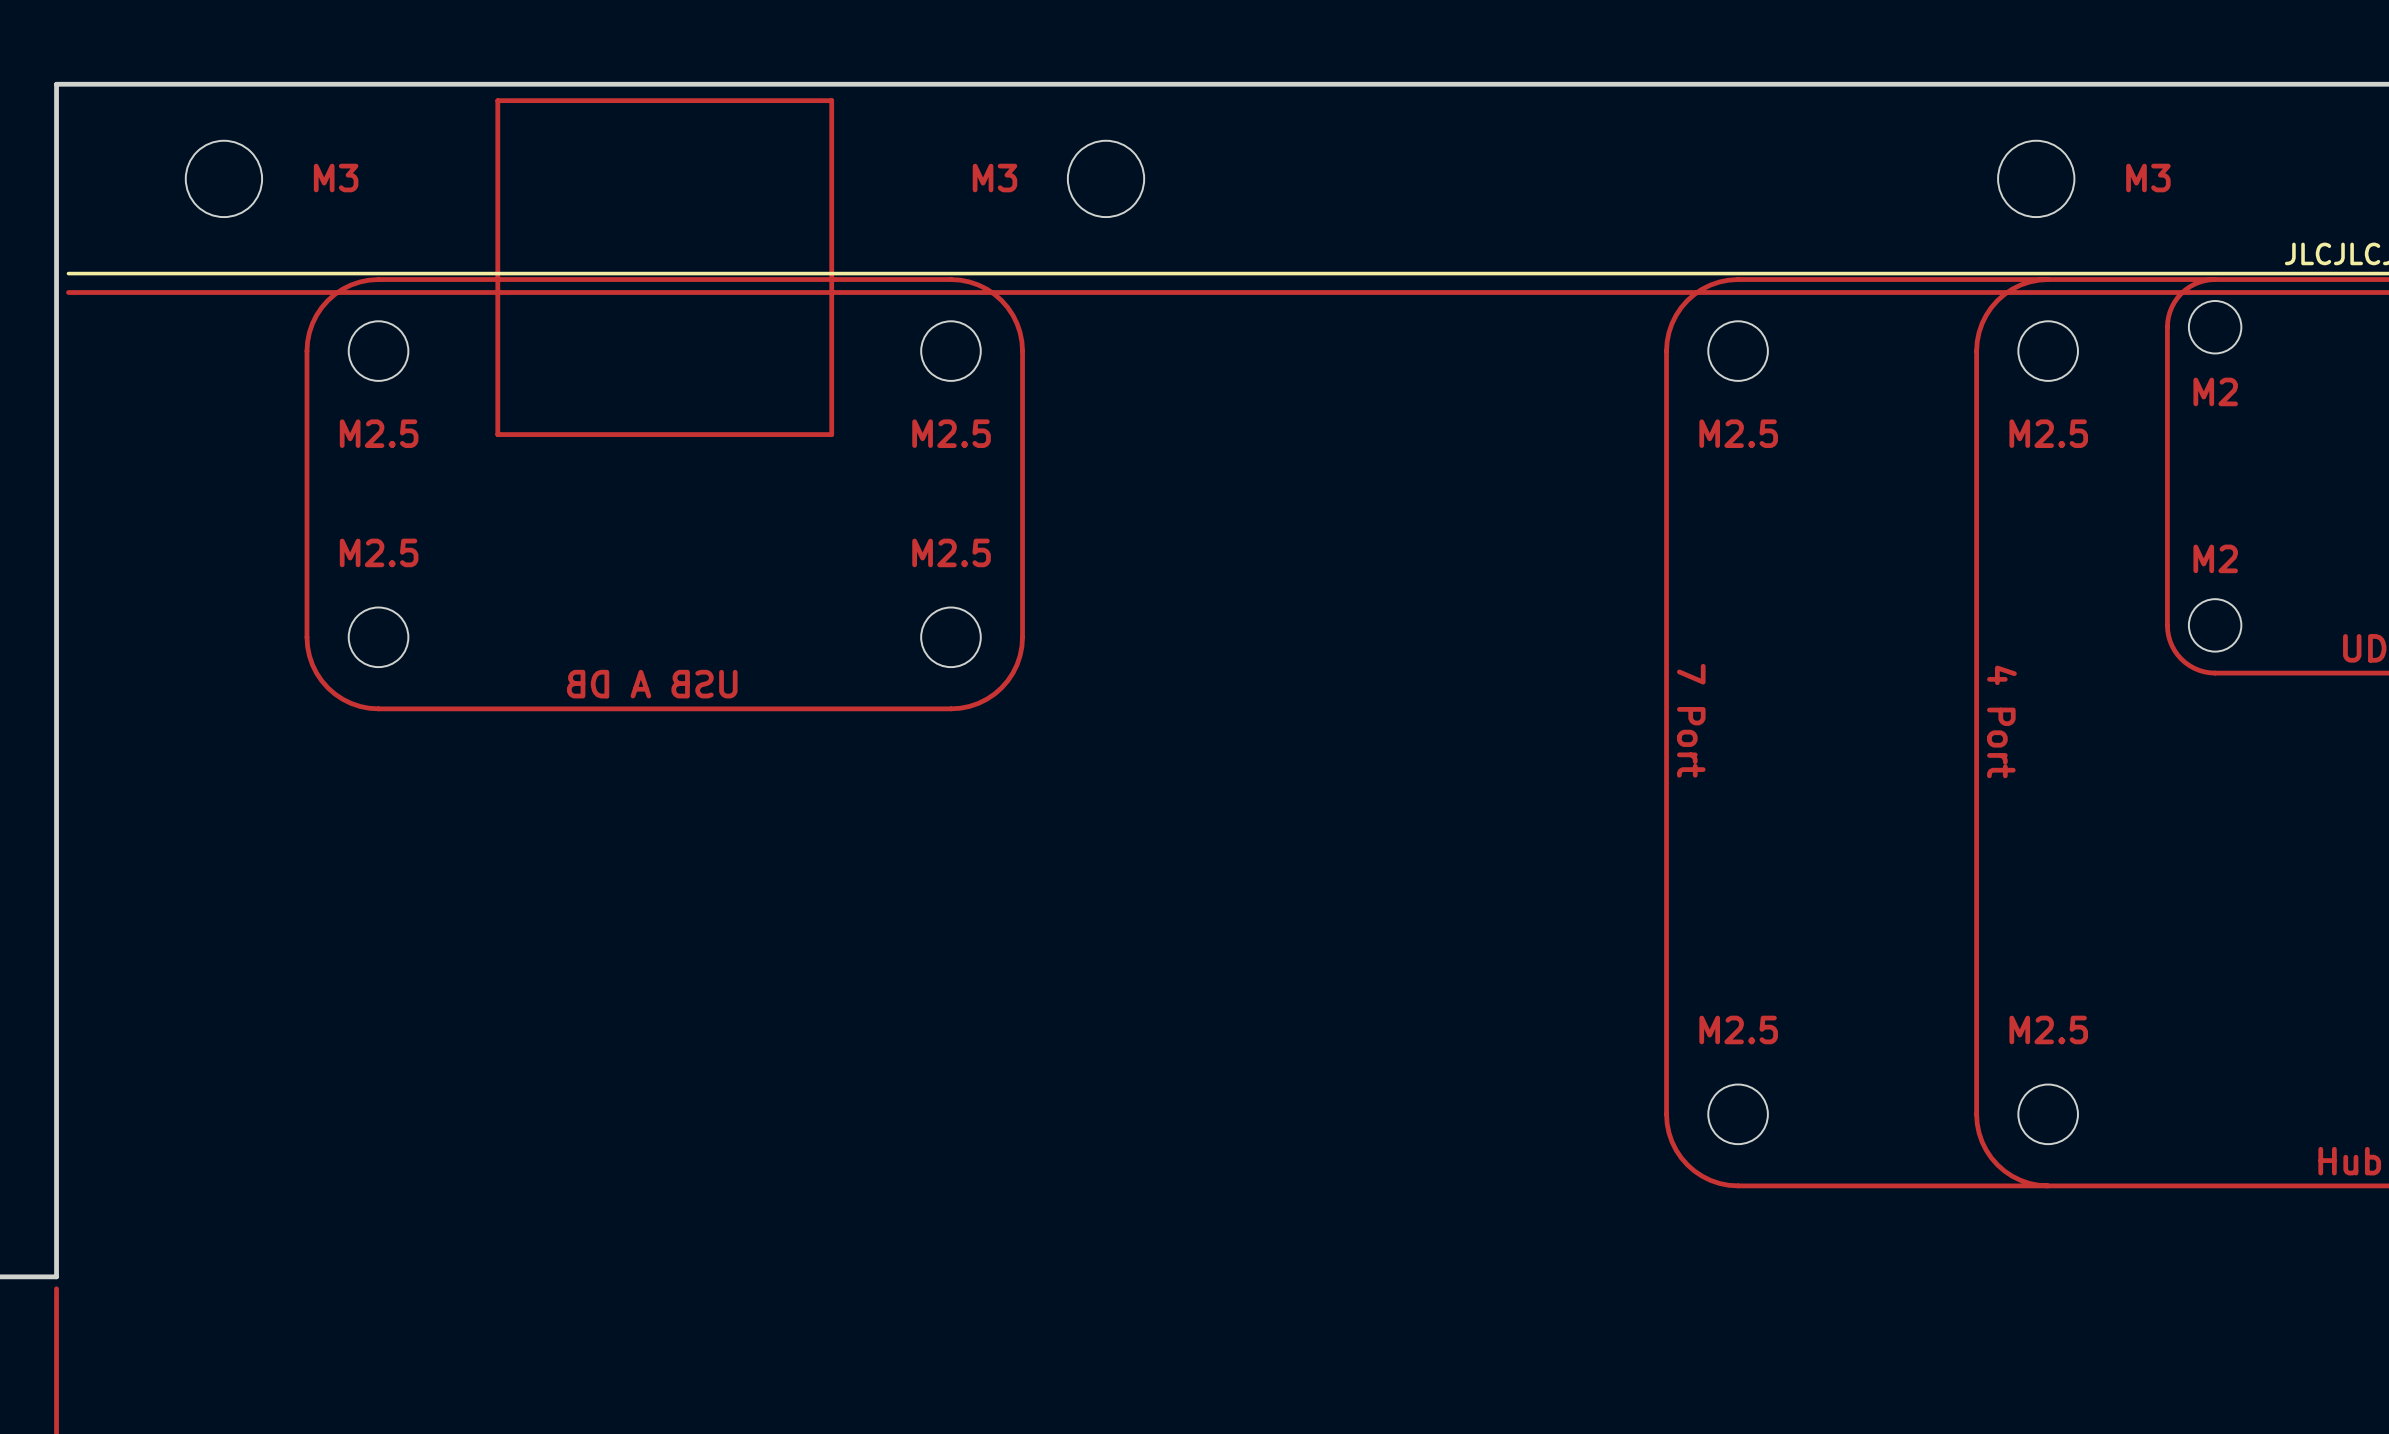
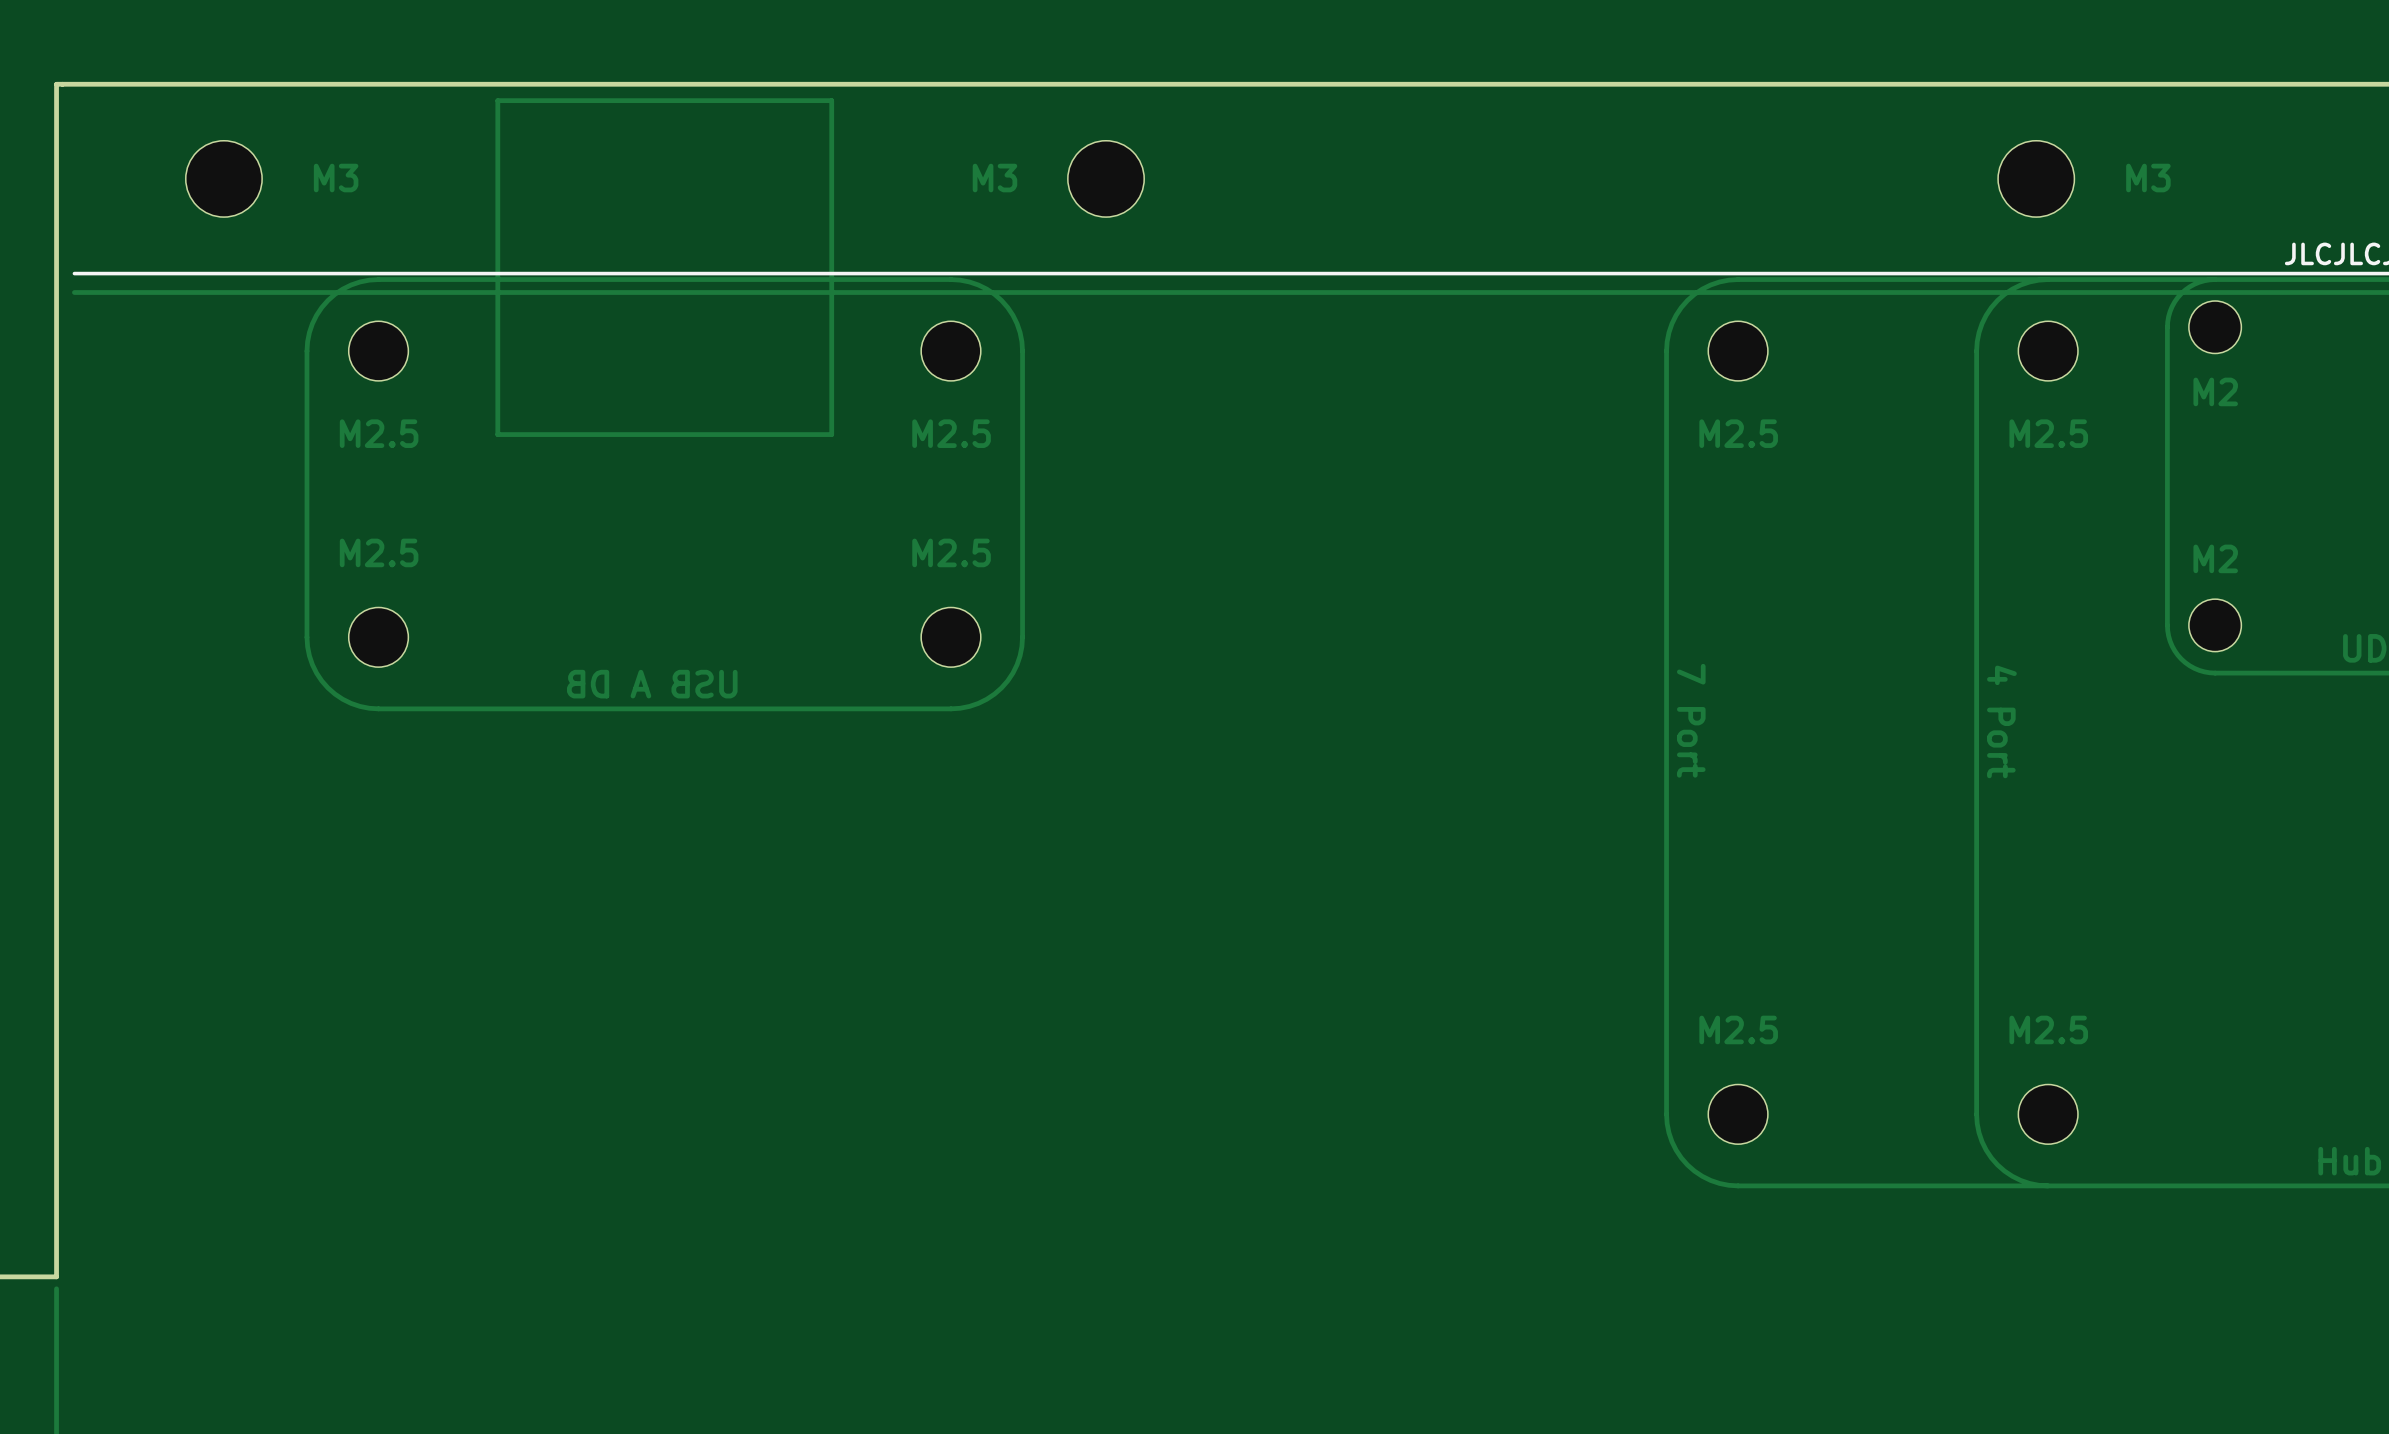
line: (68, 273) (74, 273) -> none
track: (68, 292) (74, 292) -> none

